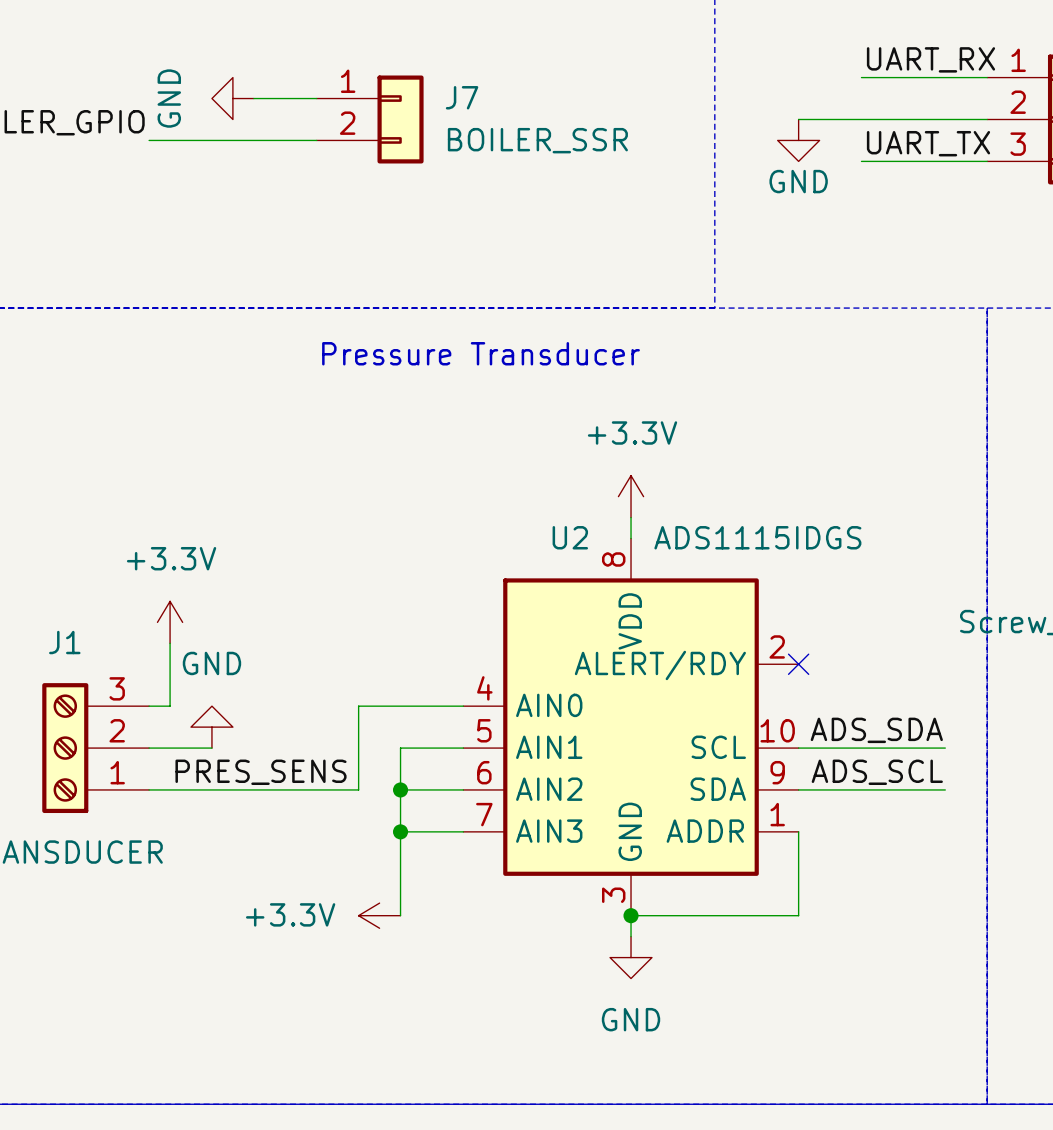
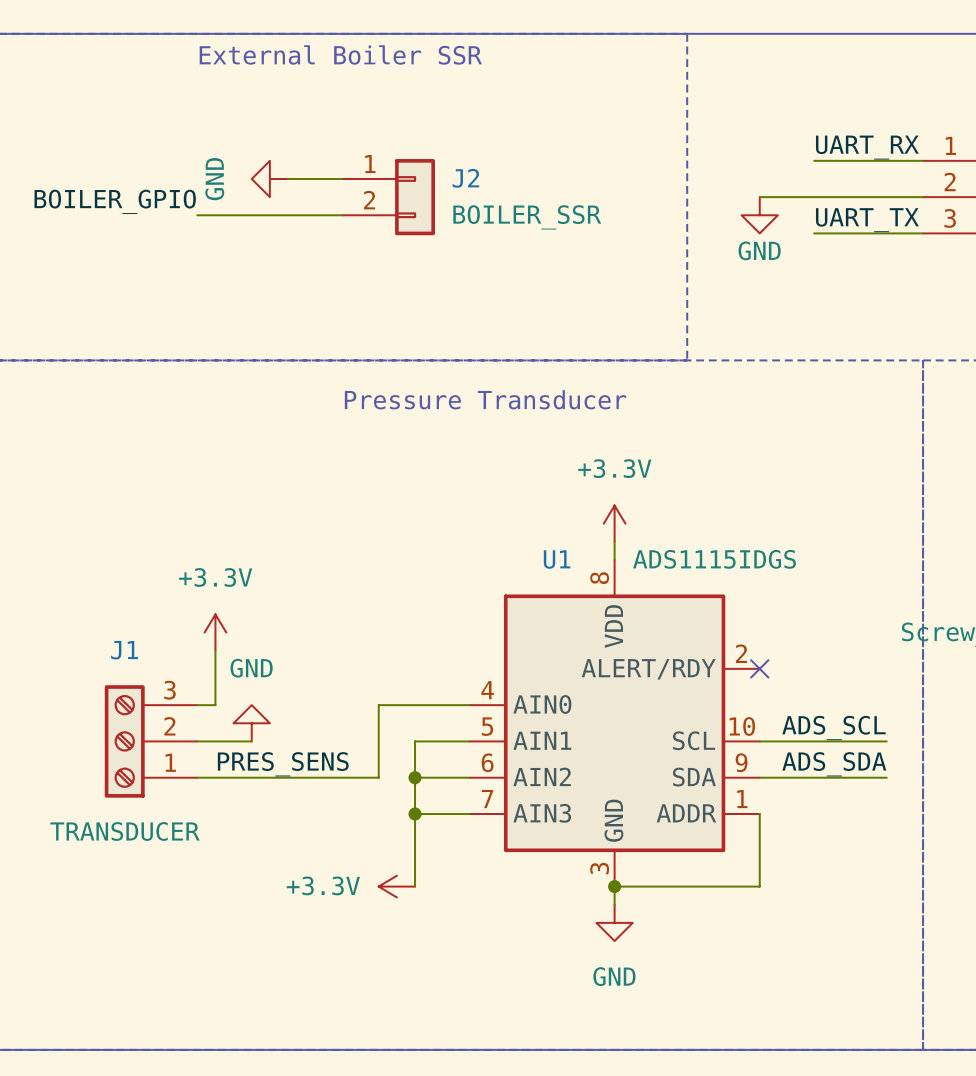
J7 name: J7 (462, 97) -> J2 (465, 178)
U2 name: U2 (570, 537) -> U1 (557, 559)
label: ADS_SDA (876, 730) -> ADS_SCL (833, 728)
label: ADS_SCL (877, 772) -> ADS_SDA (834, 764)

